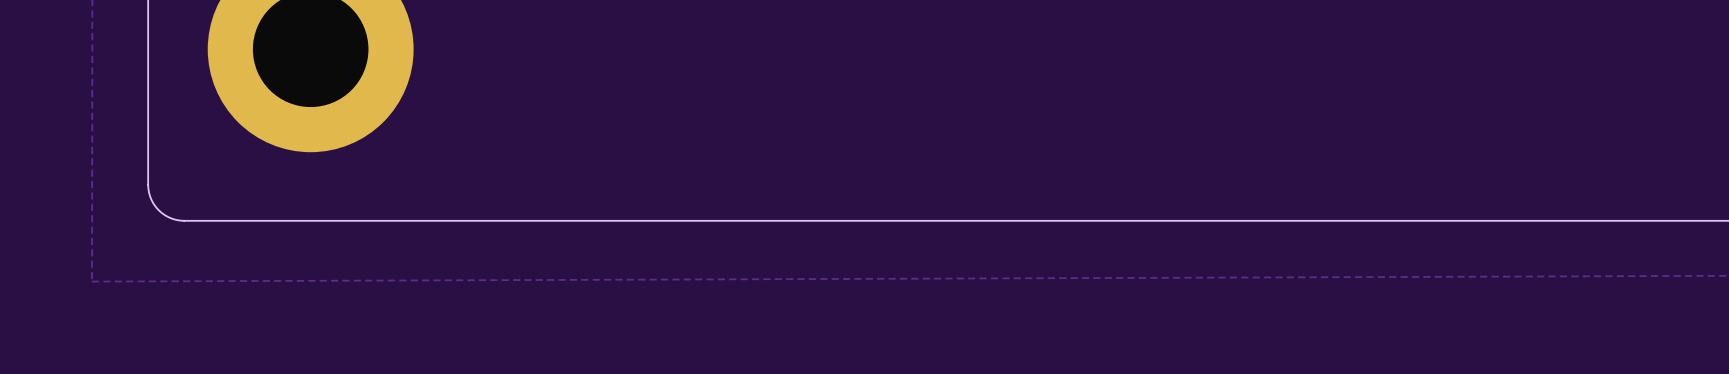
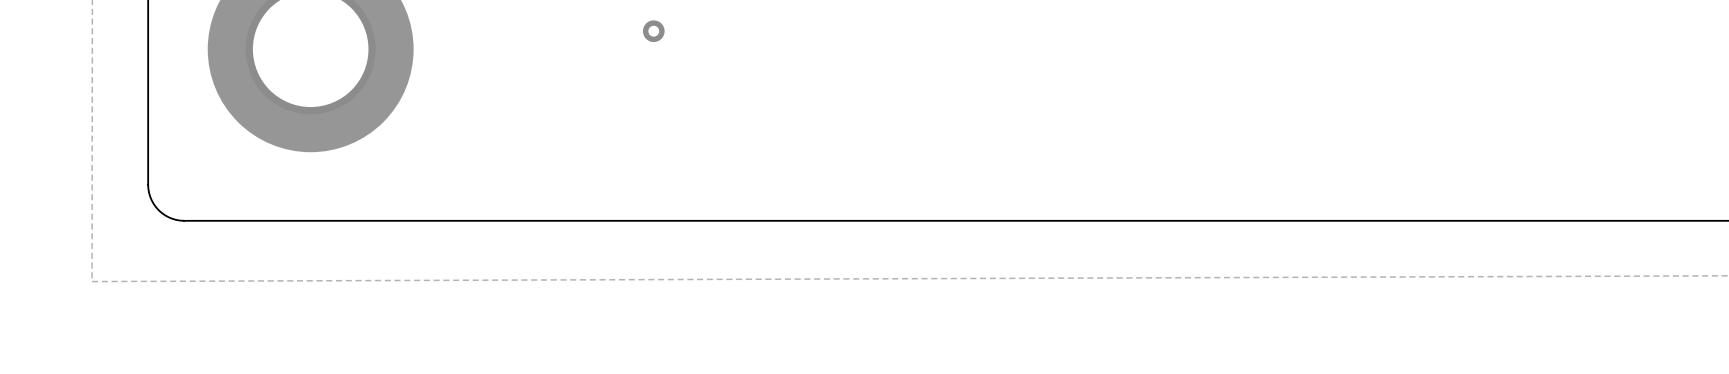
via: none -> (653, 31)

